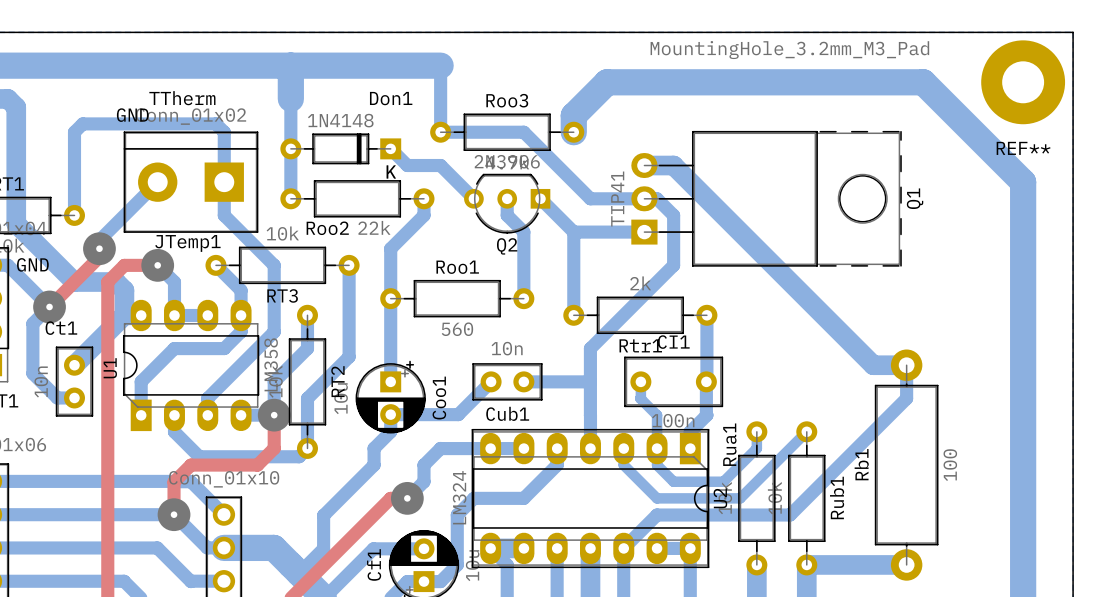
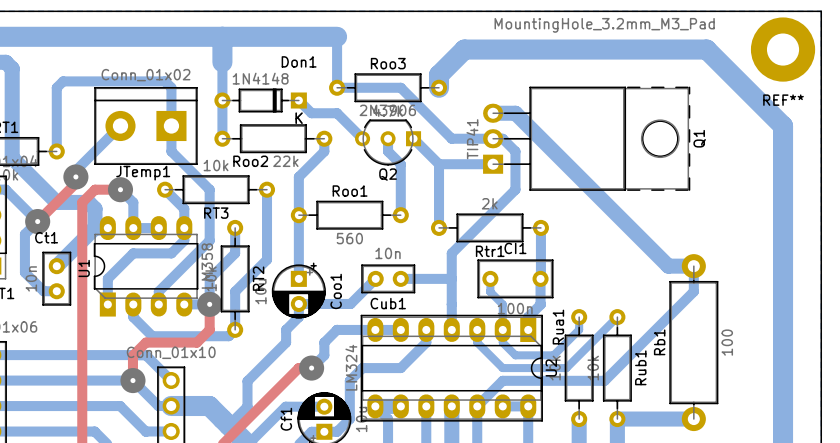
text: TTherm (182, 98) -> none
text: GND (132, 115) -> none
text: GND (32, 264) -> none

